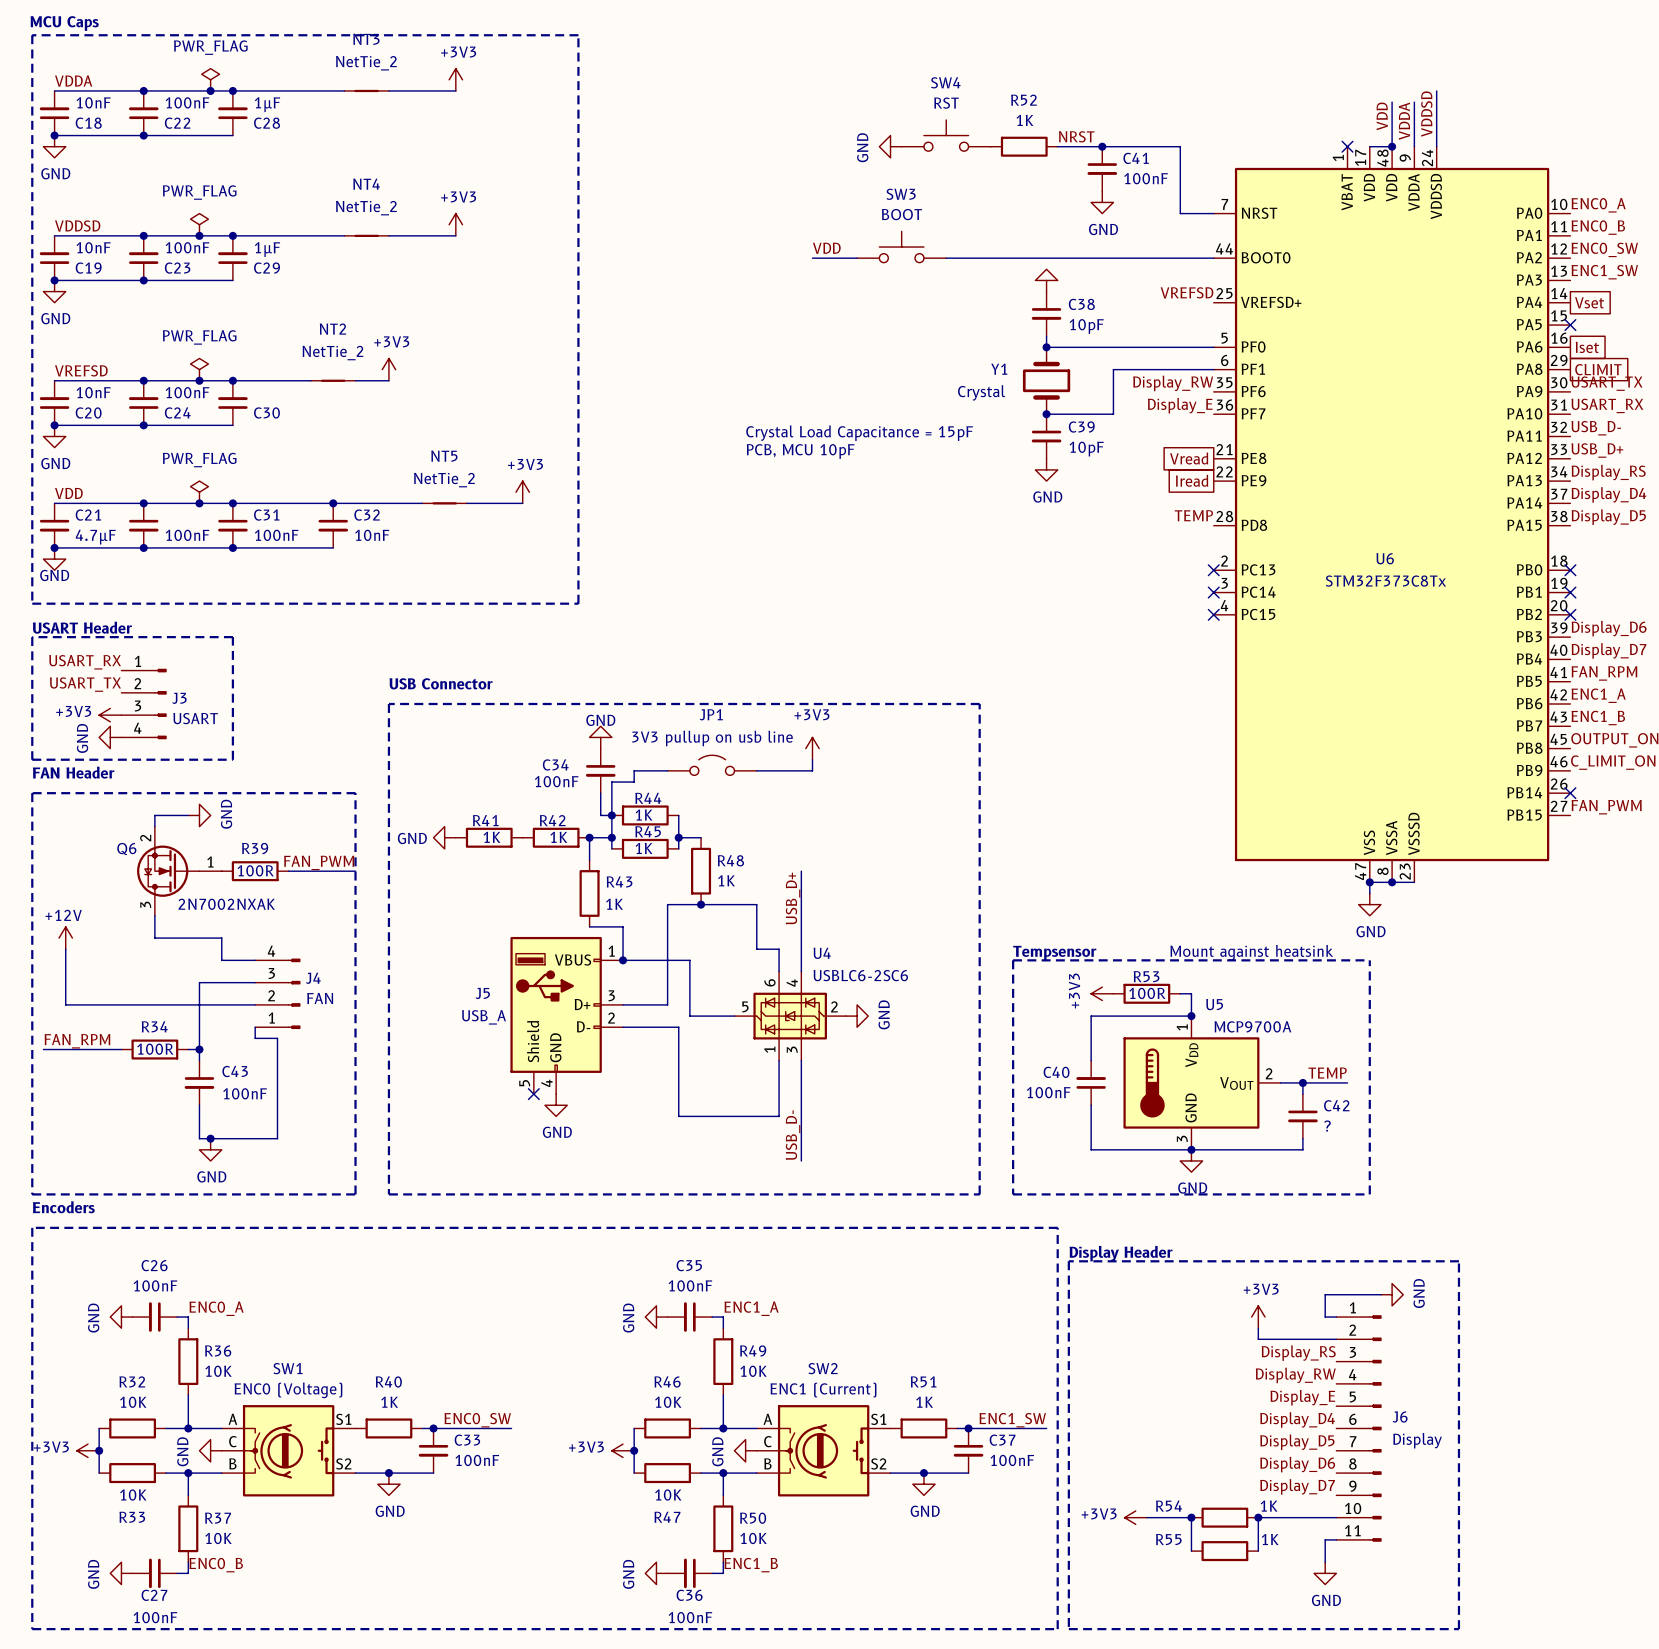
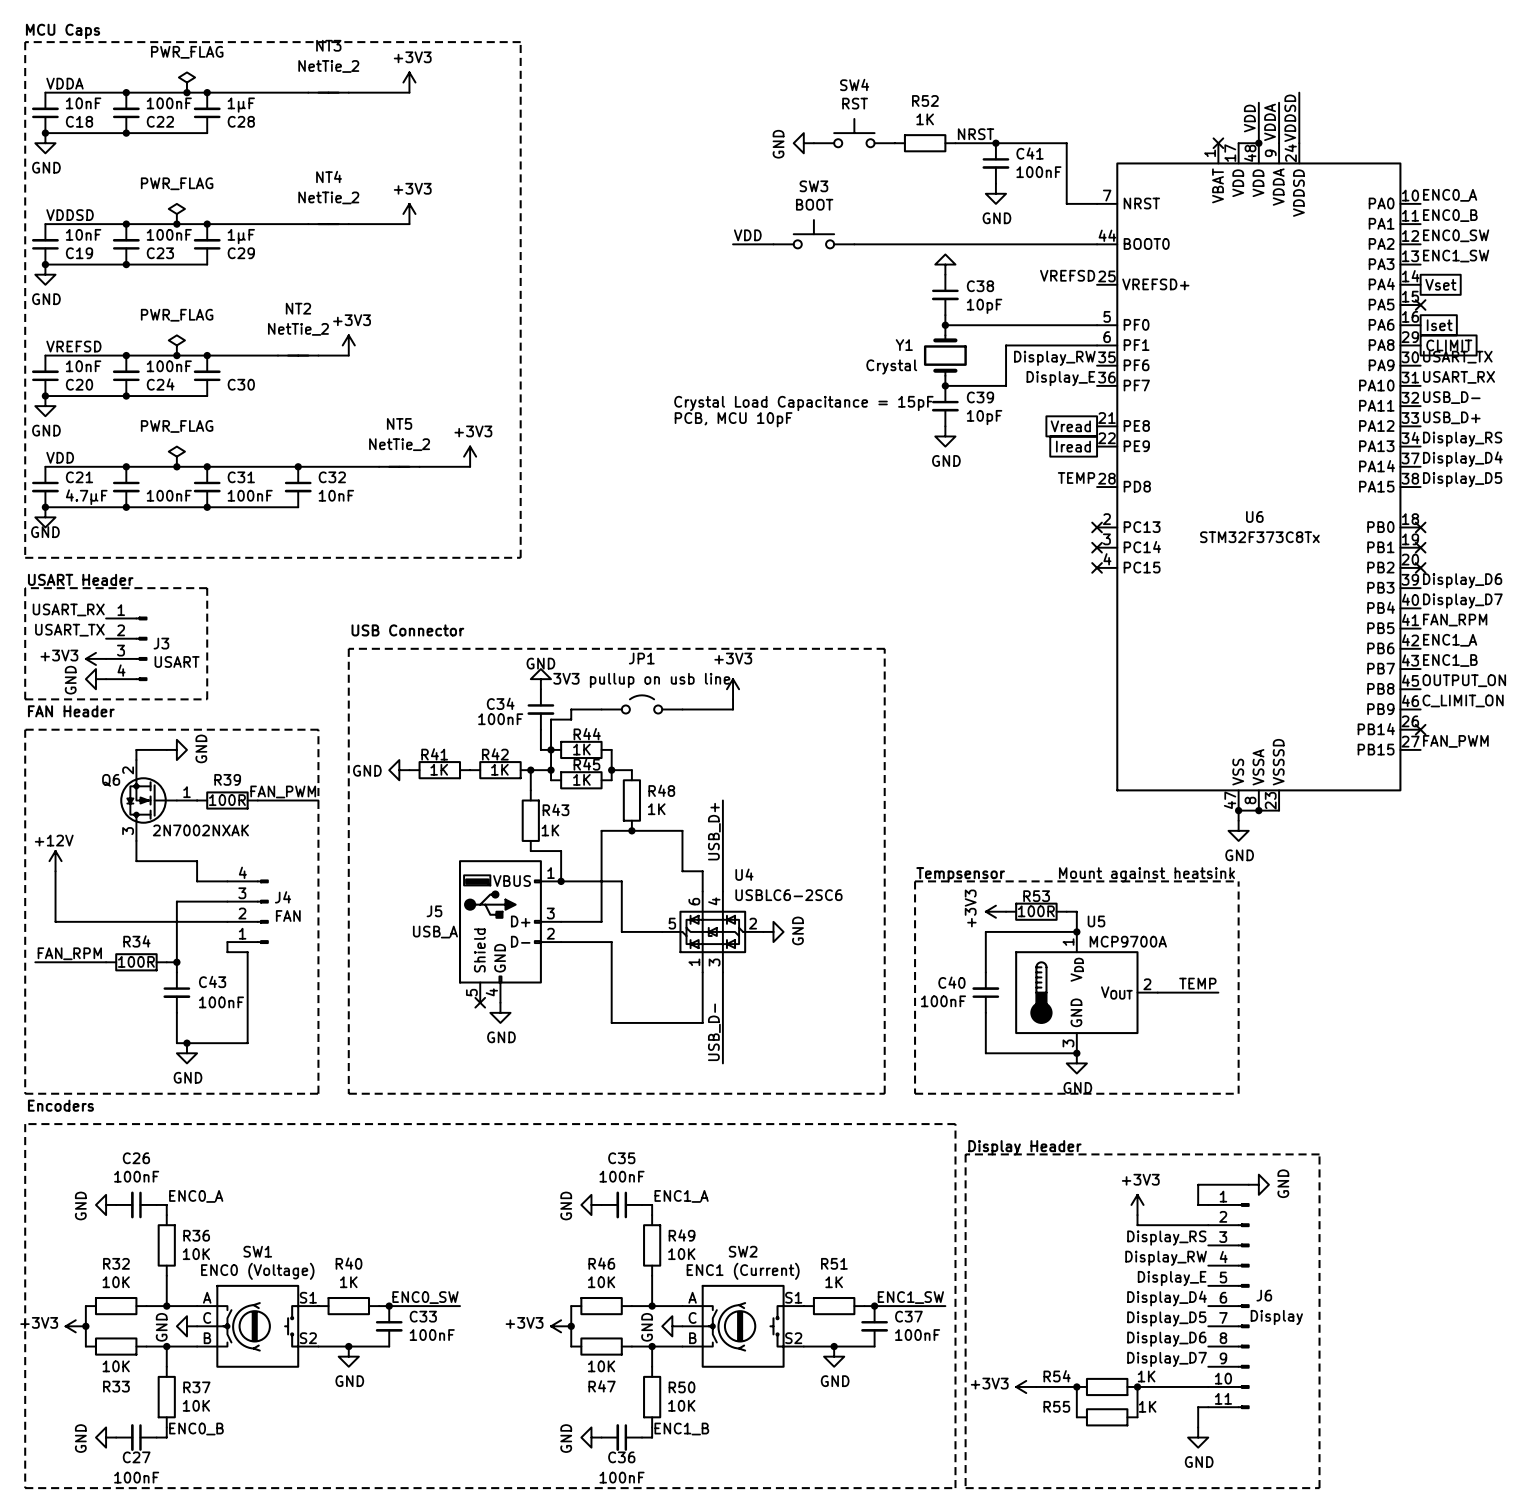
wire: (1302, 1082) (1302, 1094) -> none
junction: (1302, 1082) -> none
C42: ? (1302, 1116) -> none
wire: (1302, 1138) (1302, 1149) (1191, 1149) -> none

